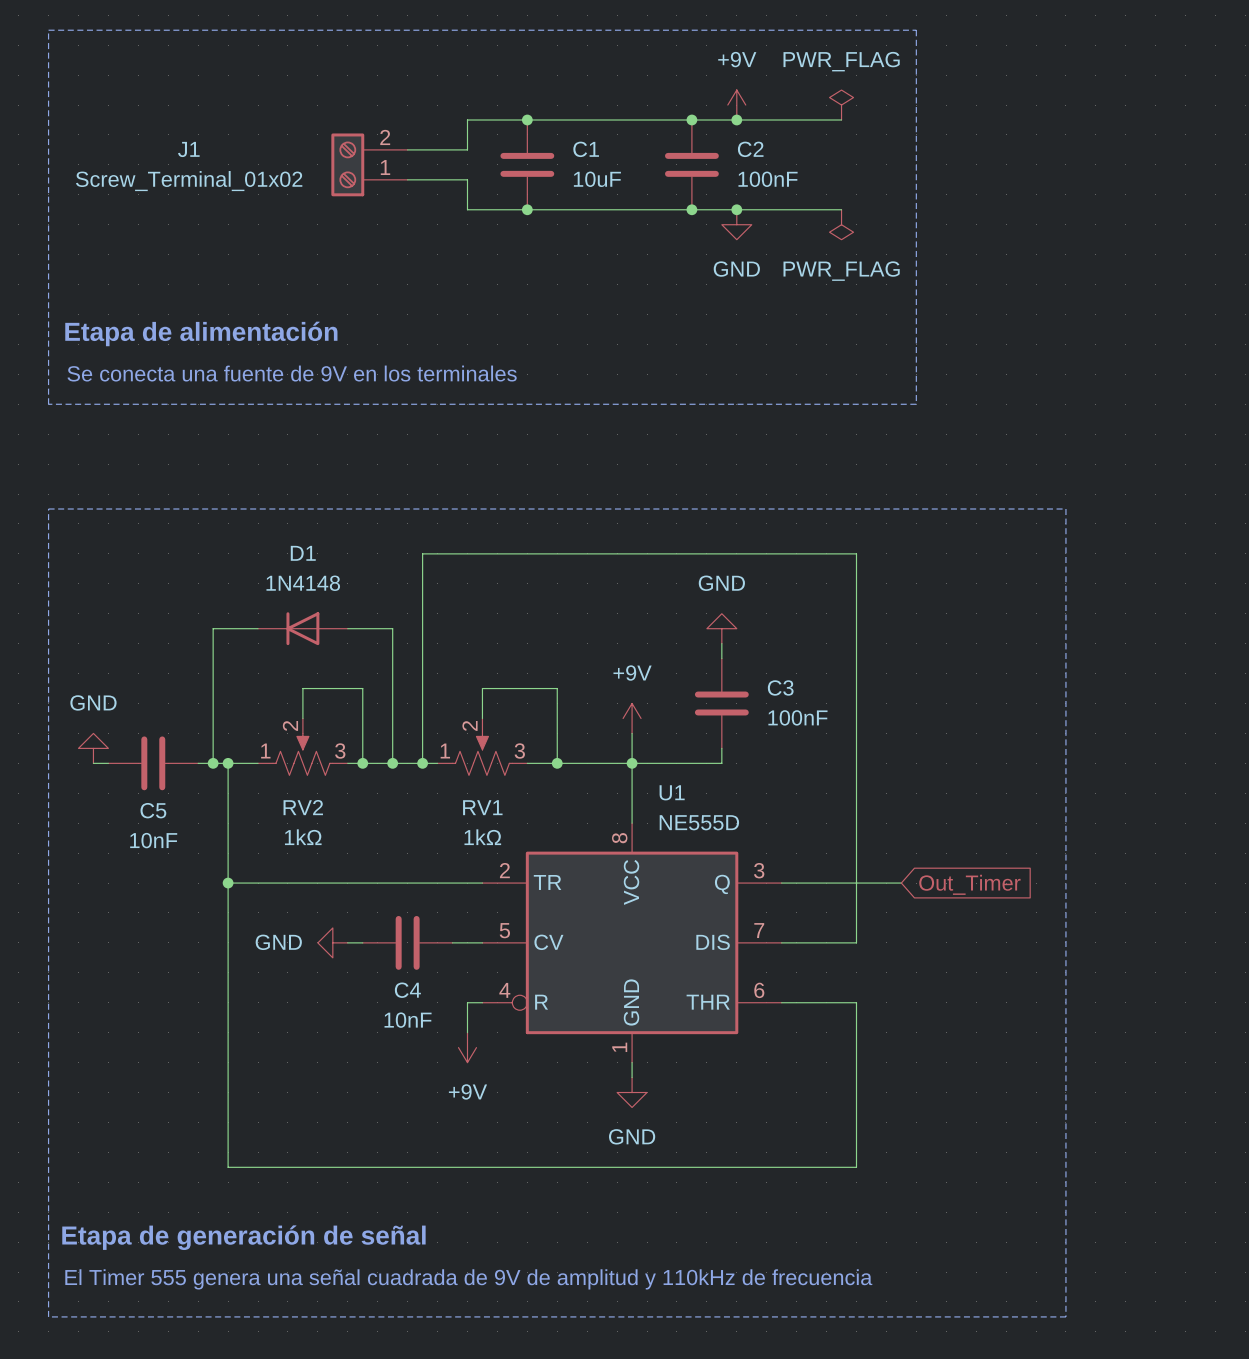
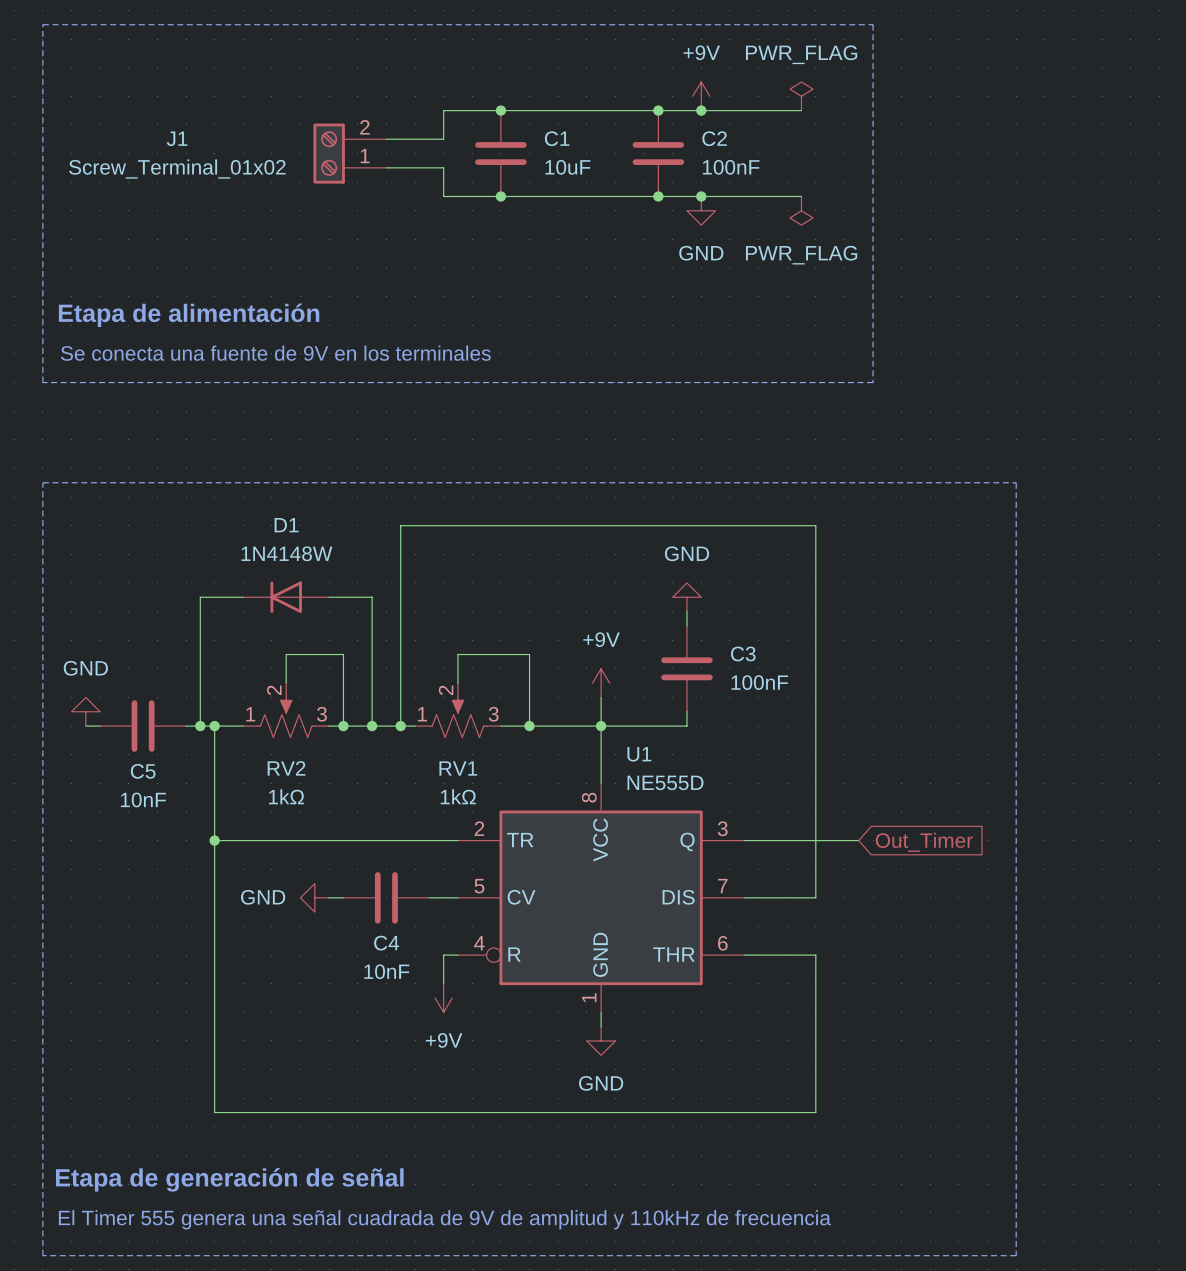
D1 value: 1N4148 (303, 583) -> 1N4148W (286, 553)

